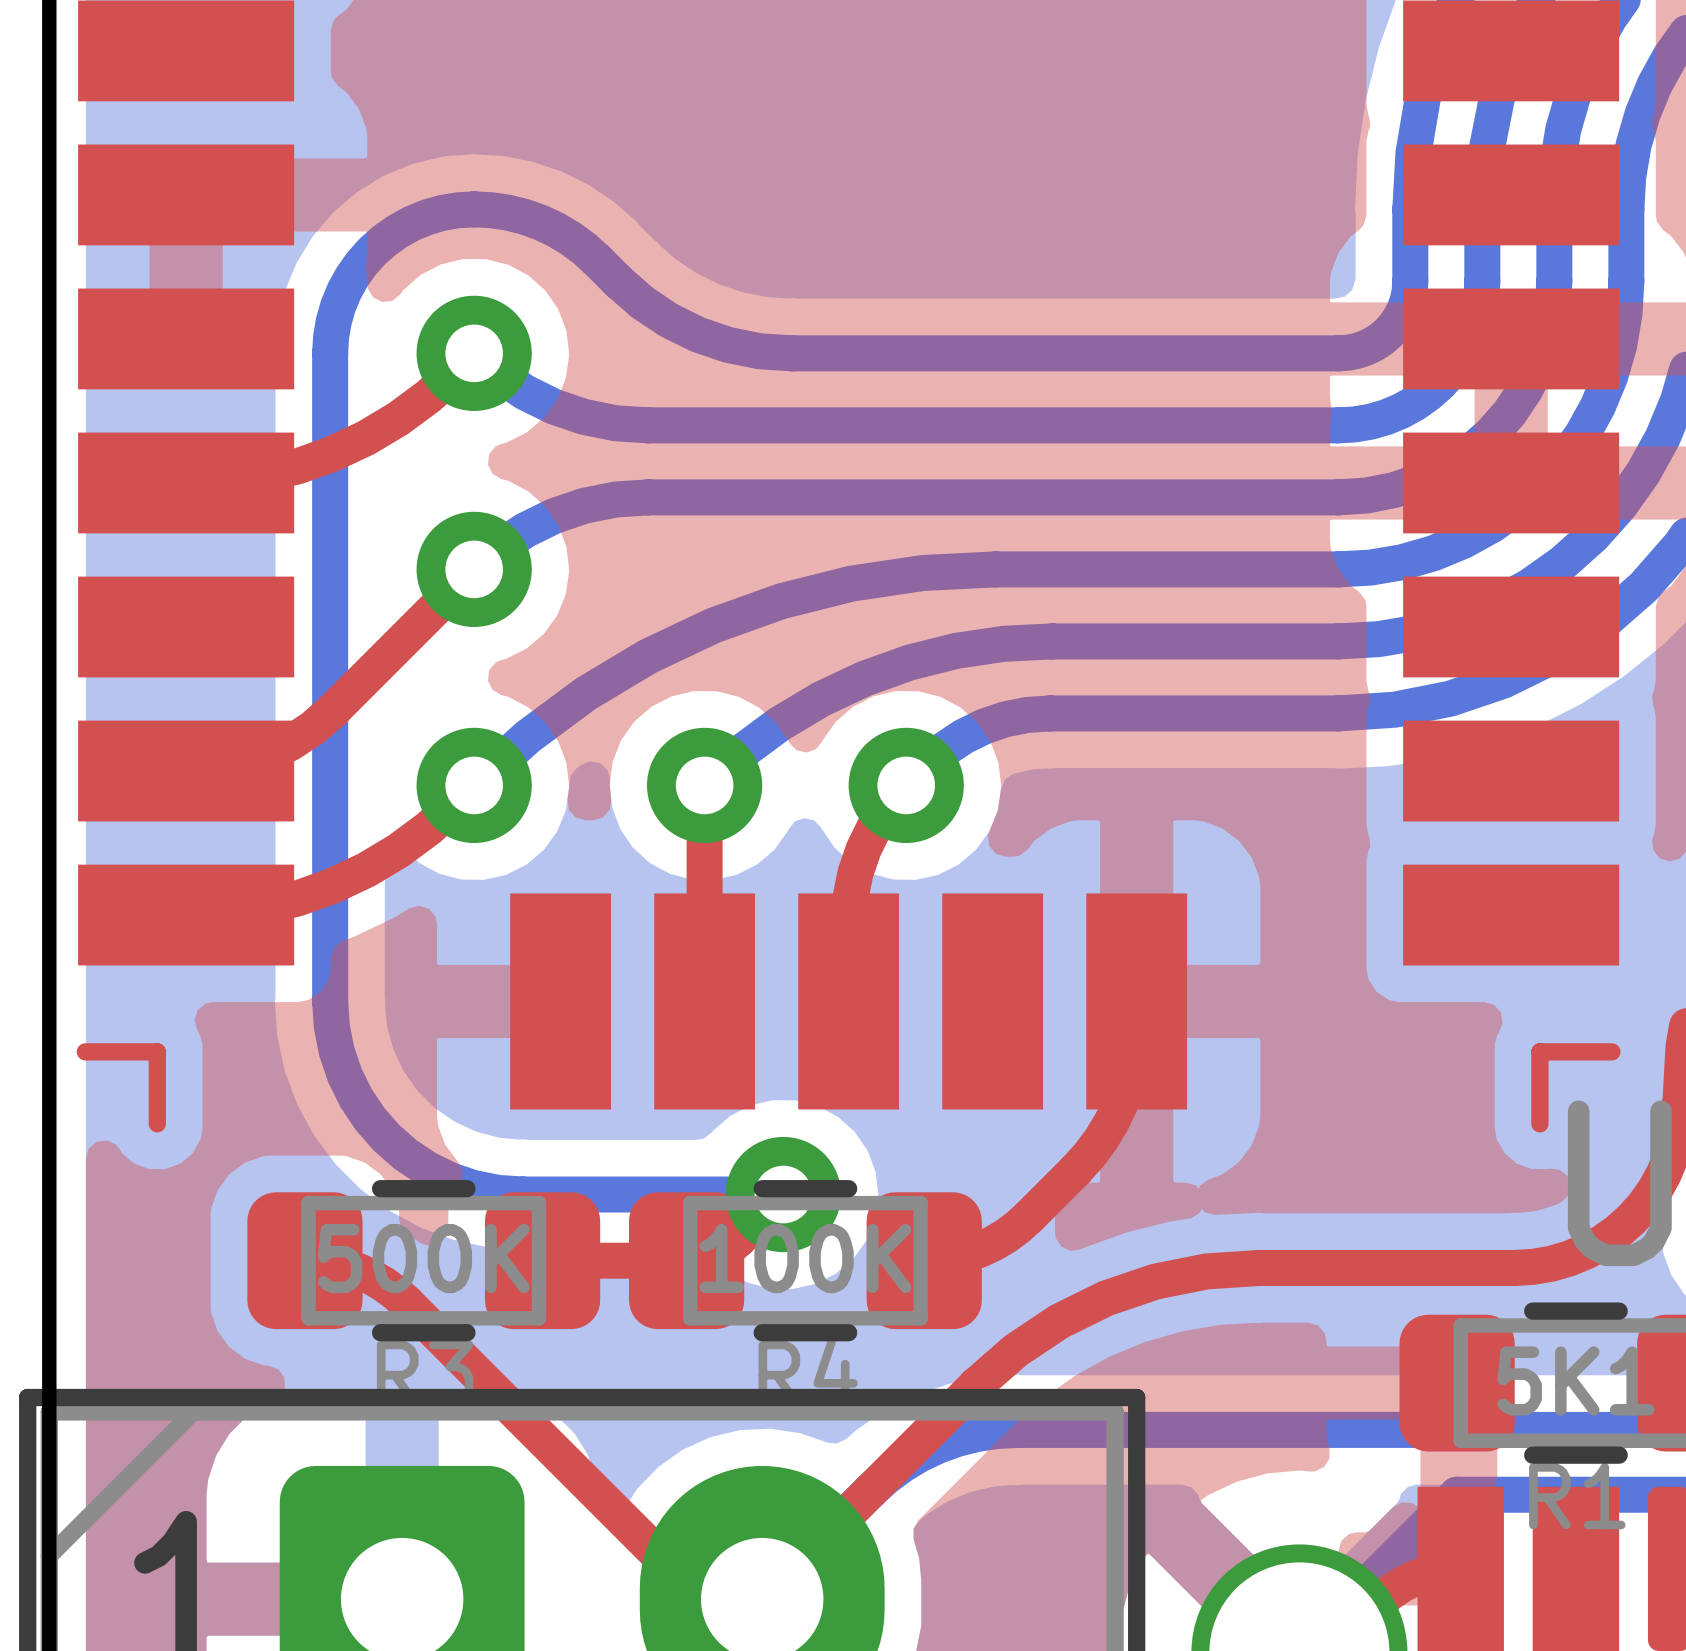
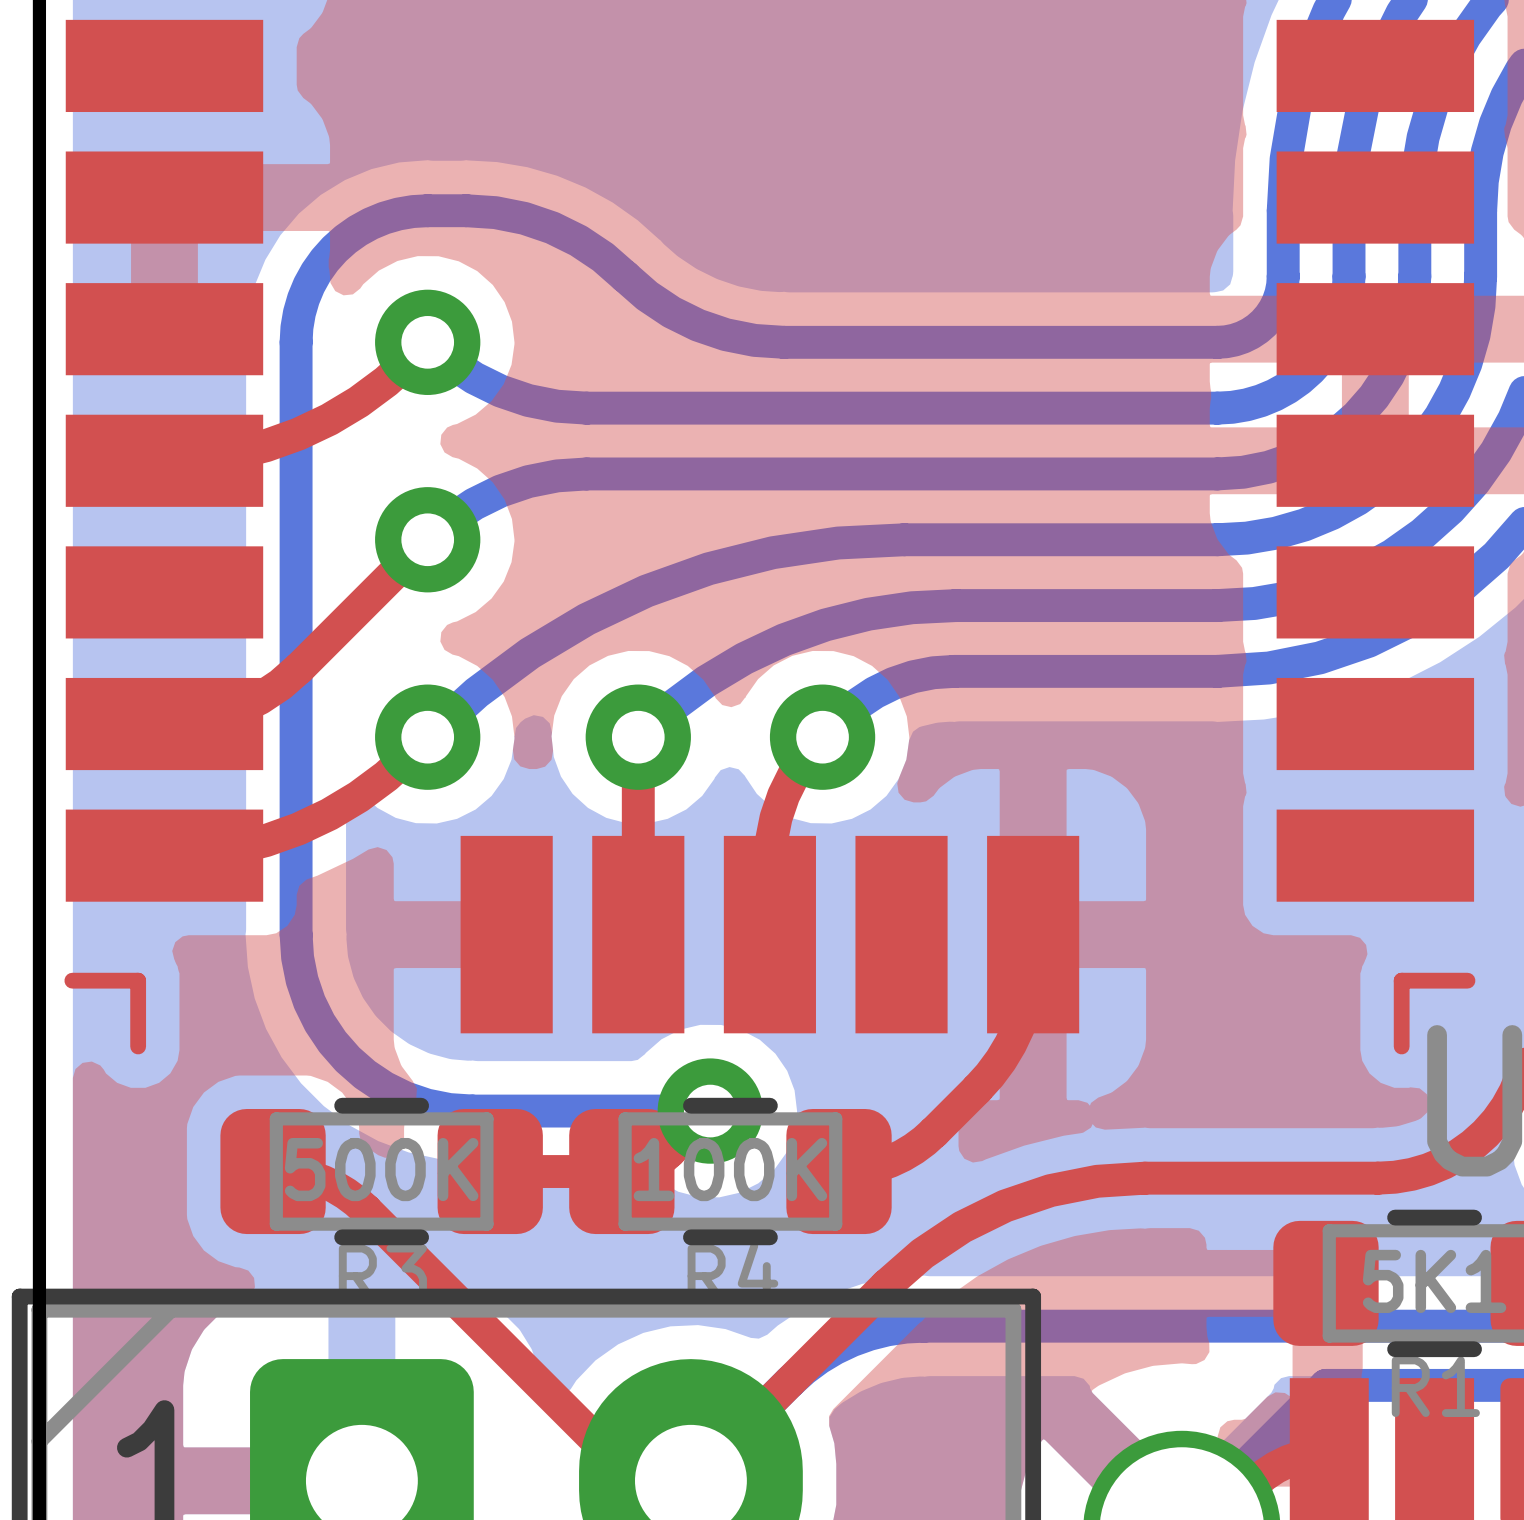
bottom track: (474, 209) (508, 212) (524, 216) (556, 229) (584, 248) (642, 302) (669, 320) (697, 334) (728, 344) (759, 351) (864, 353) -> (427, 210) (495, 212) (524, 218) (552, 227) (578, 240) (603, 257) (647, 295) (671, 312) (698, 325) (725, 334) (754, 340) (784, 342)

